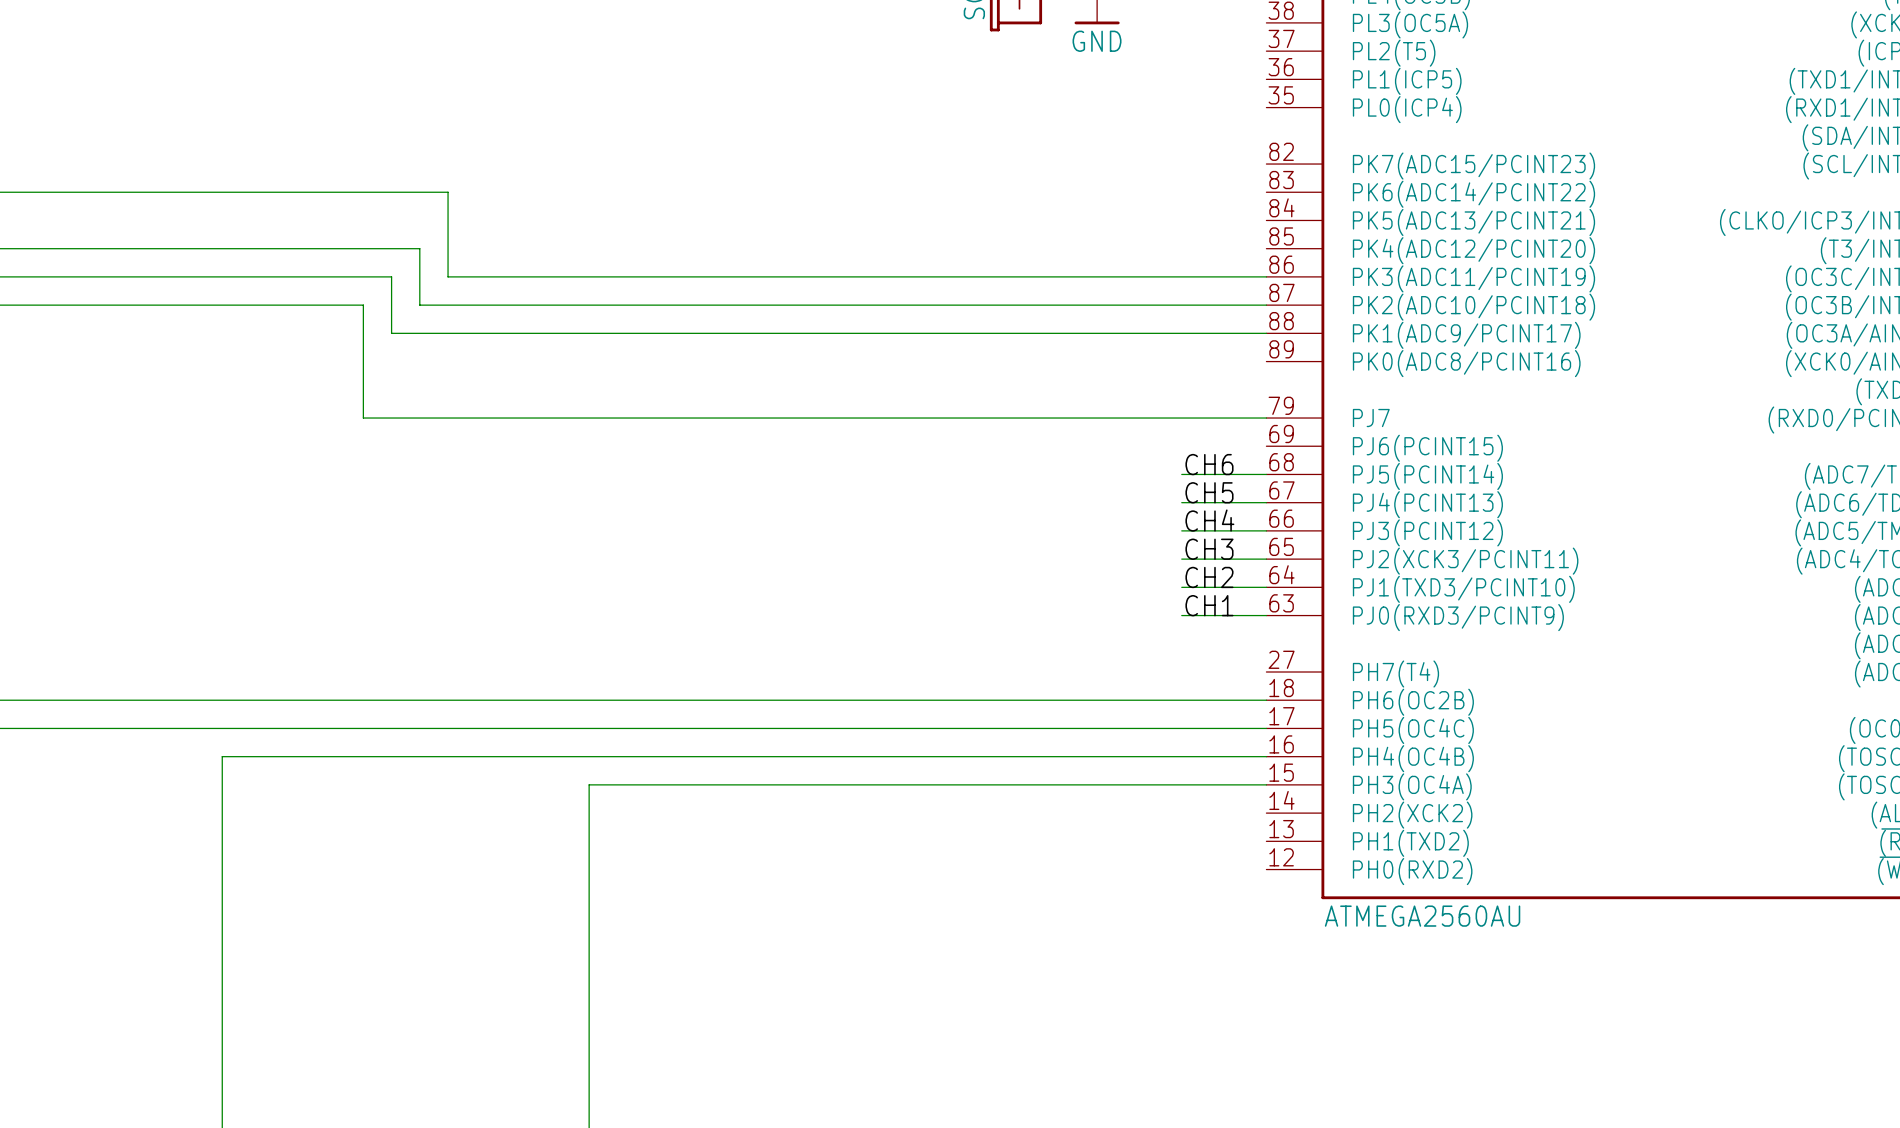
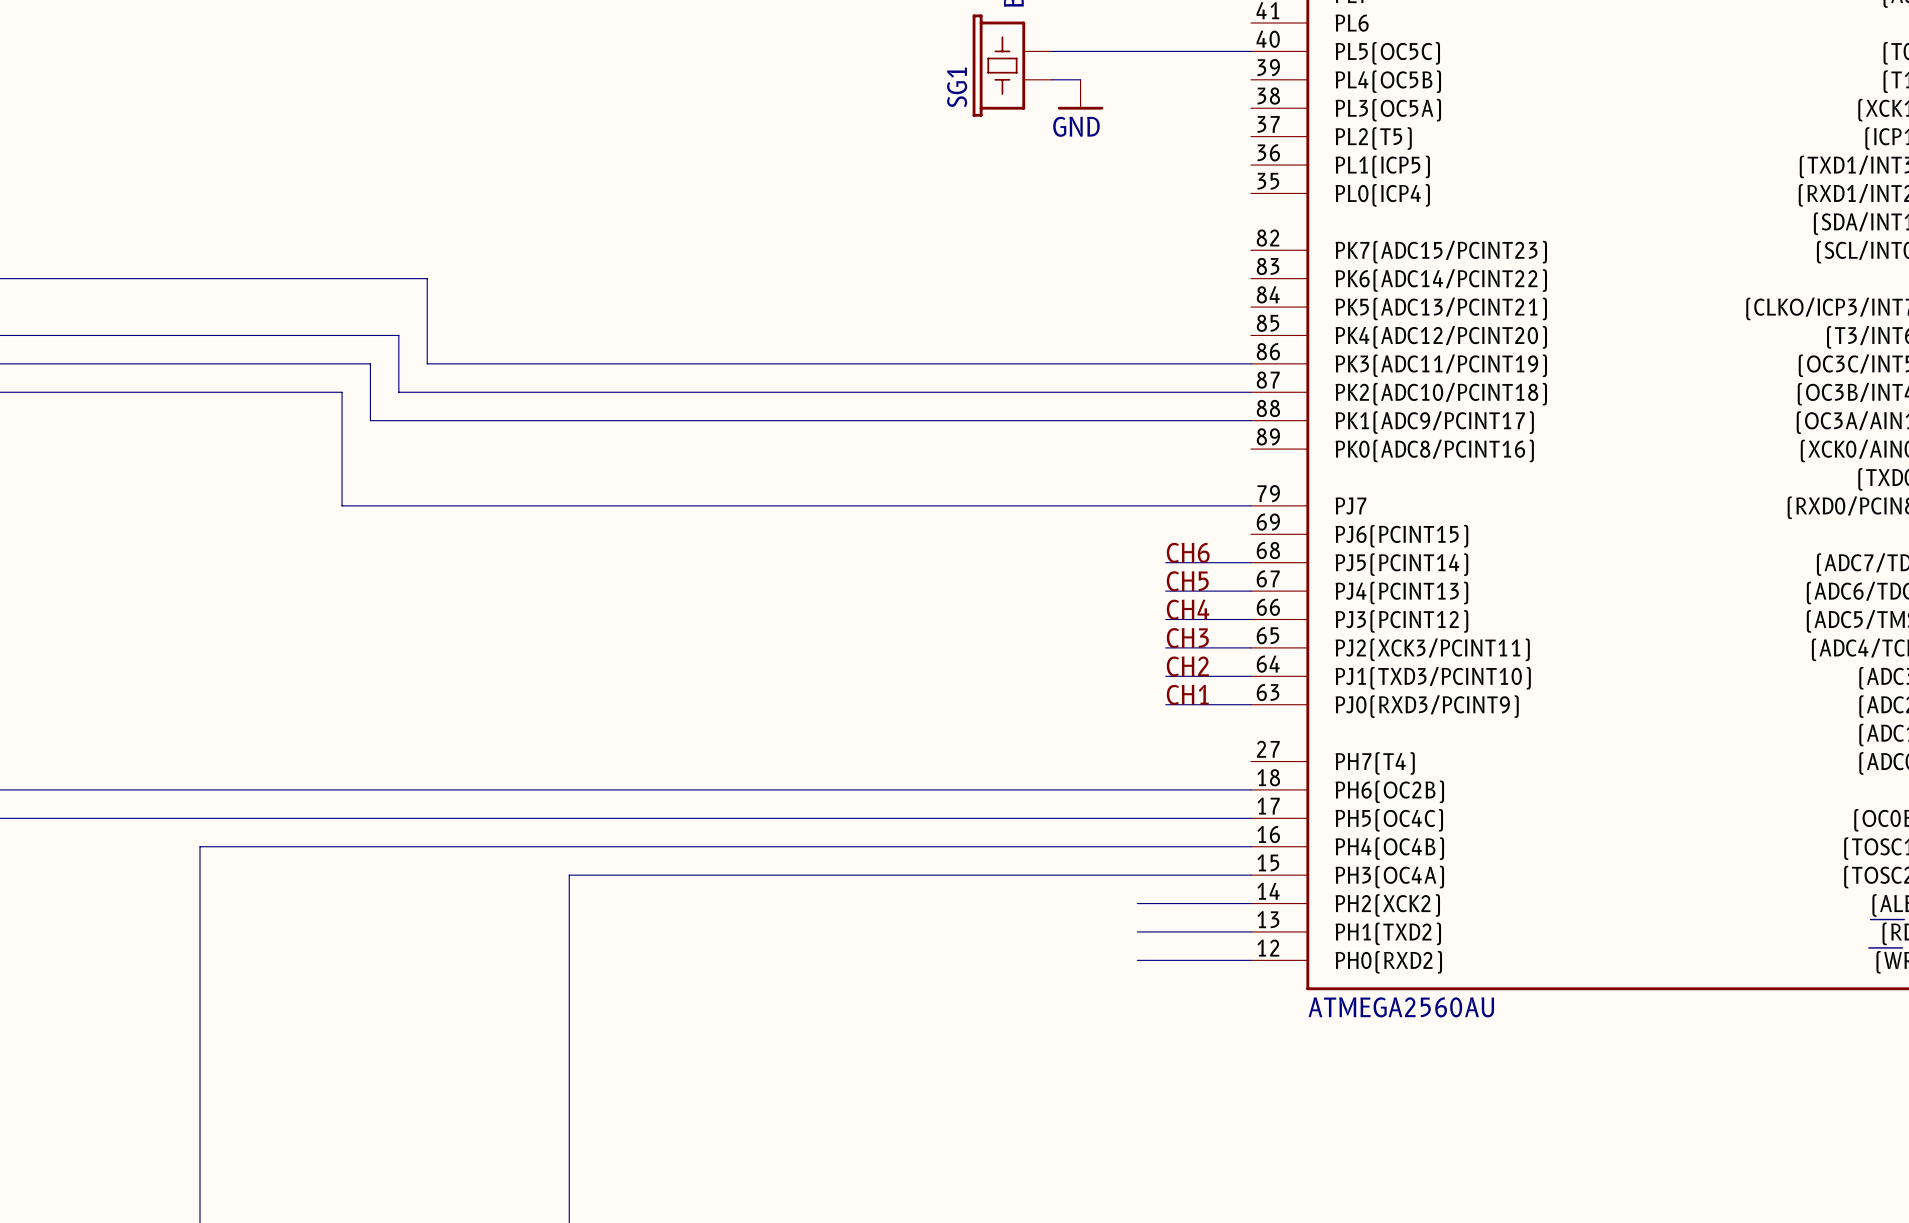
wire: none -> (1137, 903) (1250, 903)
wire: none -> (1137, 931) (1250, 931)
wire: none -> (1137, 960) (1250, 960)

